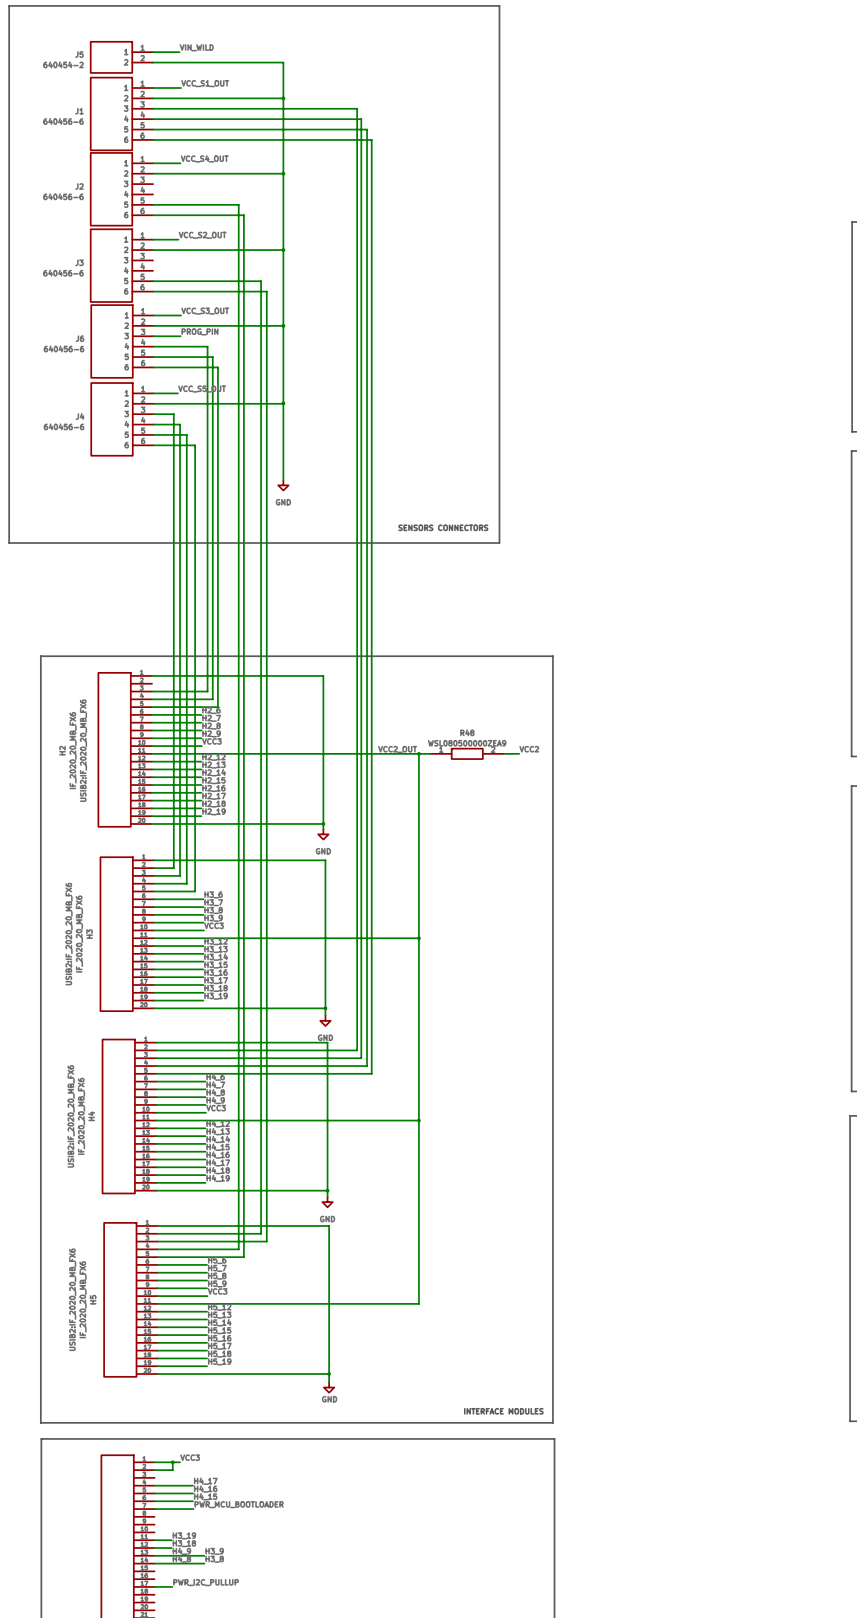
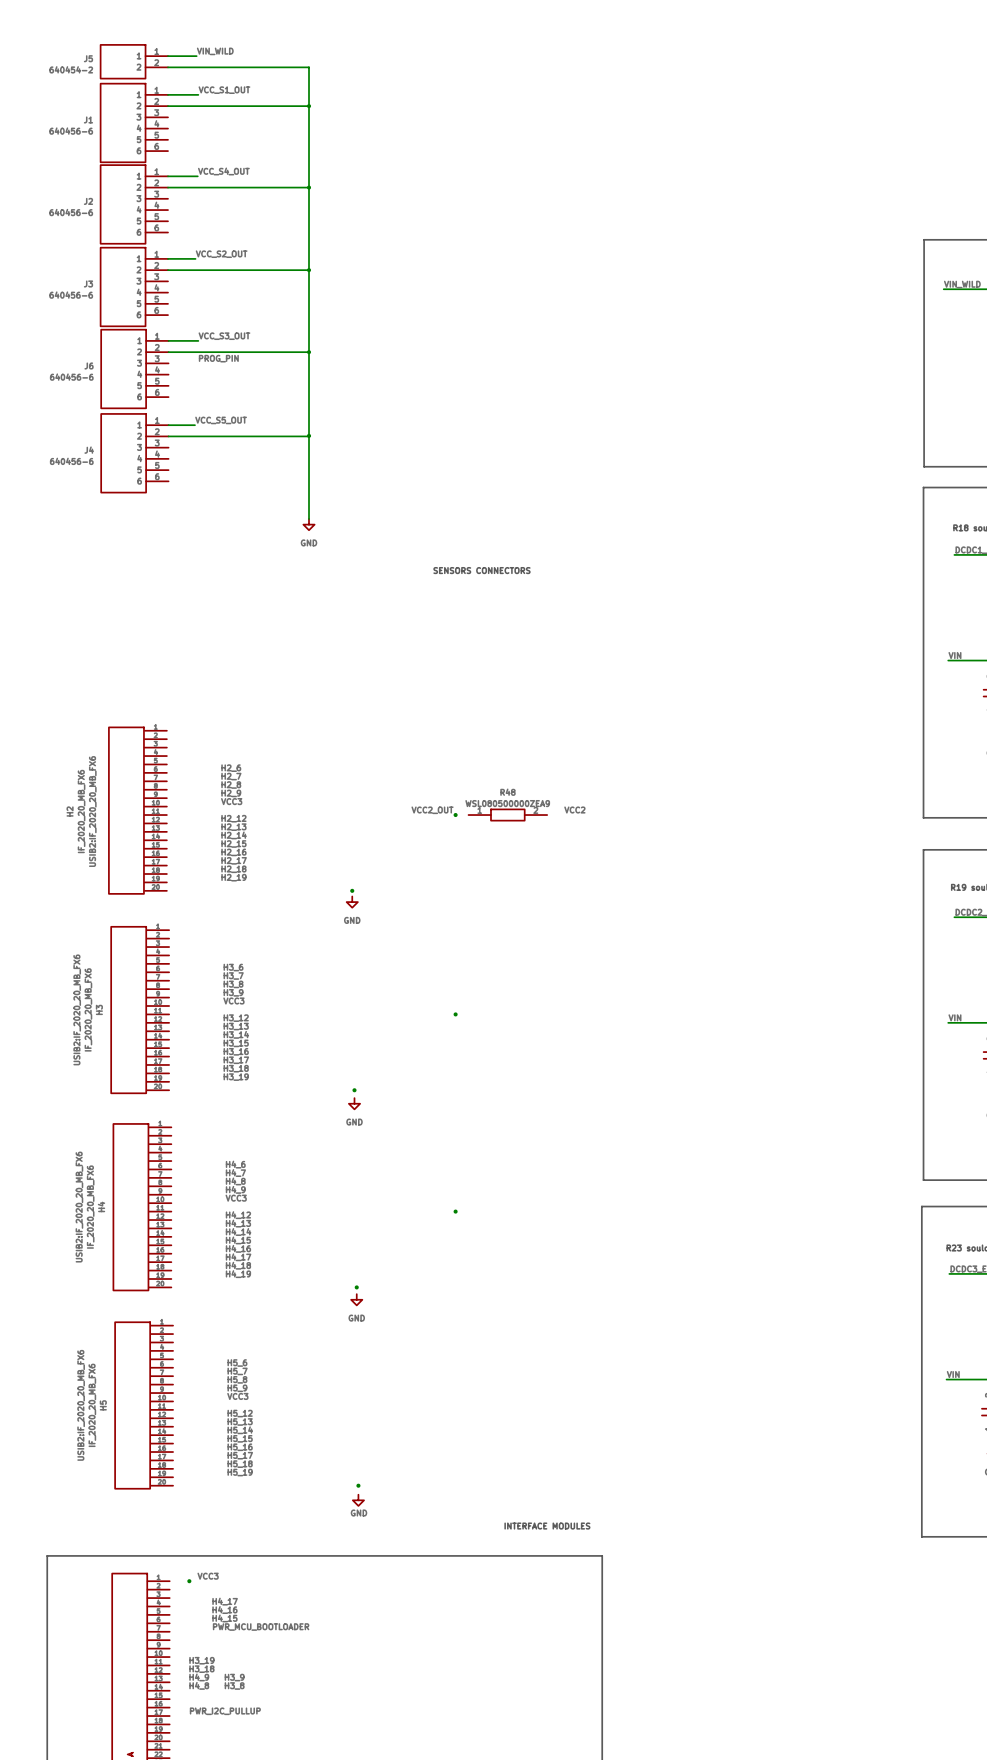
line: (9, 5) (499, 5) (499, 542) (9, 542) (9, 5) -> none
wire: (153, 108) (357, 108) (357, 1050) (156, 1050) -> none
wire: (153, 119) (361, 119) (361, 1058) (156, 1058) -> none
wire: (153, 129) (367, 129) (367, 1066) (156, 1066) -> none
wire: (153, 139) (371, 139) (371, 1073) (156, 1073) -> none
wire: (153, 204) (238, 204) (238, 1249) (157, 1249) -> none
wire: (153, 215) (243, 215) (243, 1257) (157, 1257) -> none
wire: (153, 281) (261, 281) (261, 1233) (157, 1233) -> none
wire: (153, 291) (266, 291) (266, 1241) (157, 1241) -> none
wire: (153, 336) (180, 336) -> none
wire: (153, 346) (207, 346) (207, 691) (151, 691) -> none
wire: (153, 357) (212, 357) (212, 699) (151, 699) -> none
wire: (153, 367) (217, 367) (217, 707) (151, 707) -> none
wire: (153, 414) (173, 414) (173, 868) (154, 868) -> none
wire: (153, 424) (180, 424) (180, 875) (154, 875) -> none
wire: (153, 434) (186, 434) (186, 883) (154, 883) -> none
wire: (153, 445) (195, 445) (195, 891) (154, 891) -> none
line: (40, 656) (552, 656) (552, 1422) (40, 1422) (40, 656) -> none
wire: (151, 675) (323, 675) (323, 829) -> none
wire: (151, 714) (201, 714) -> none
wire: (151, 722) (201, 722) -> none
wire: (151, 730) (201, 730) -> none
wire: (151, 738) (201, 738) -> none
wire: (151, 746) (201, 746) -> none
wire: (151, 753) (430, 753) -> none
wire: (418, 753) (418, 1303) (157, 1303) -> none
wire: (503, 753) (519, 753) -> none
wire: (151, 761) (201, 761) -> none
wire: (151, 769) (201, 769) -> none
wire: (151, 777) (201, 777) -> none
wire: (151, 785) (201, 785) -> none
wire: (151, 792) (201, 792) -> none
wire: (151, 800) (201, 800) -> none
wire: (151, 808) (201, 808) -> none
wire: (151, 816) (201, 816) -> none
wire: (151, 823) (323, 823) -> none
wire: (154, 860) (325, 860) (325, 1015) -> none
wire: (154, 899) (203, 899) -> none
wire: (154, 907) (203, 907) -> none
wire: (154, 914) (203, 914) -> none
wire: (154, 922) (203, 922) -> none
wire: (154, 930) (203, 930) -> none
wire: (154, 938) (418, 938) -> none
wire: (154, 946) (203, 946) -> none
wire: (154, 953) (203, 953) -> none
wire: (154, 961) (203, 961) -> none
wire: (154, 969) (203, 969) -> none
wire: (154, 977) (203, 977) -> none
wire: (154, 984) (203, 984) -> none
wire: (154, 992) (203, 992) -> none
wire: (154, 1000) (203, 1000) -> none
wire: (154, 1008) (325, 1008) -> none
wire: (156, 1042) (327, 1042) (327, 1196) -> none
wire: (156, 1081) (205, 1081) -> none
wire: (156, 1089) (205, 1089) -> none
wire: (156, 1097) (205, 1097) -> none
wire: (156, 1104) (205, 1104) -> none
wire: (156, 1112) (206, 1112) -> none
wire: (156, 1120) (418, 1120) -> none
wire: (156, 1128) (205, 1128) -> none
wire: (156, 1136) (205, 1136) -> none
wire: (156, 1143) (205, 1143) -> none
wire: (156, 1151) (205, 1151) -> none
wire: (156, 1159) (205, 1159) -> none
wire: (156, 1167) (205, 1167) -> none
wire: (156, 1175) (205, 1175) -> none
wire: (156, 1182) (205, 1182) -> none
wire: (156, 1190) (327, 1190) -> none
wire: (157, 1225) (329, 1225) (329, 1382) -> none
wire: (157, 1264) (207, 1264) -> none
wire: (157, 1272) (207, 1272) -> none
wire: (157, 1280) (207, 1280) -> none
wire: (157, 1288) (207, 1288) -> none
wire: (157, 1296) (207, 1296) -> none
wire: (157, 1311) (207, 1311) -> none
wire: (157, 1319) (207, 1319) -> none
wire: (157, 1327) (207, 1327) -> none
wire: (157, 1335) (207, 1335) -> none
wire: (157, 1342) (207, 1342) -> none
wire: (157, 1350) (207, 1350) -> none
wire: (157, 1358) (207, 1358) -> none
wire: (157, 1366) (207, 1366) -> none
wire: (157, 1374) (329, 1374) -> none
wire: (154, 1462) (180, 1462) -> none
wire: (172, 1462) (172, 1470) (154, 1470) -> none
wire: (154, 1485) (193, 1485) -> none
wire: (154, 1493) (193, 1493) -> none
wire: (154, 1501) (193, 1501) -> none
wire: (154, 1509) (193, 1509) -> none
wire: (154, 1540) (171, 1540) -> none
wire: (154, 1548) (171, 1548) -> none
wire: (154, 1555) (204, 1555) -> none
wire: (154, 1563) (204, 1563) -> none
wire: (154, 1586) (172, 1586) -> none

